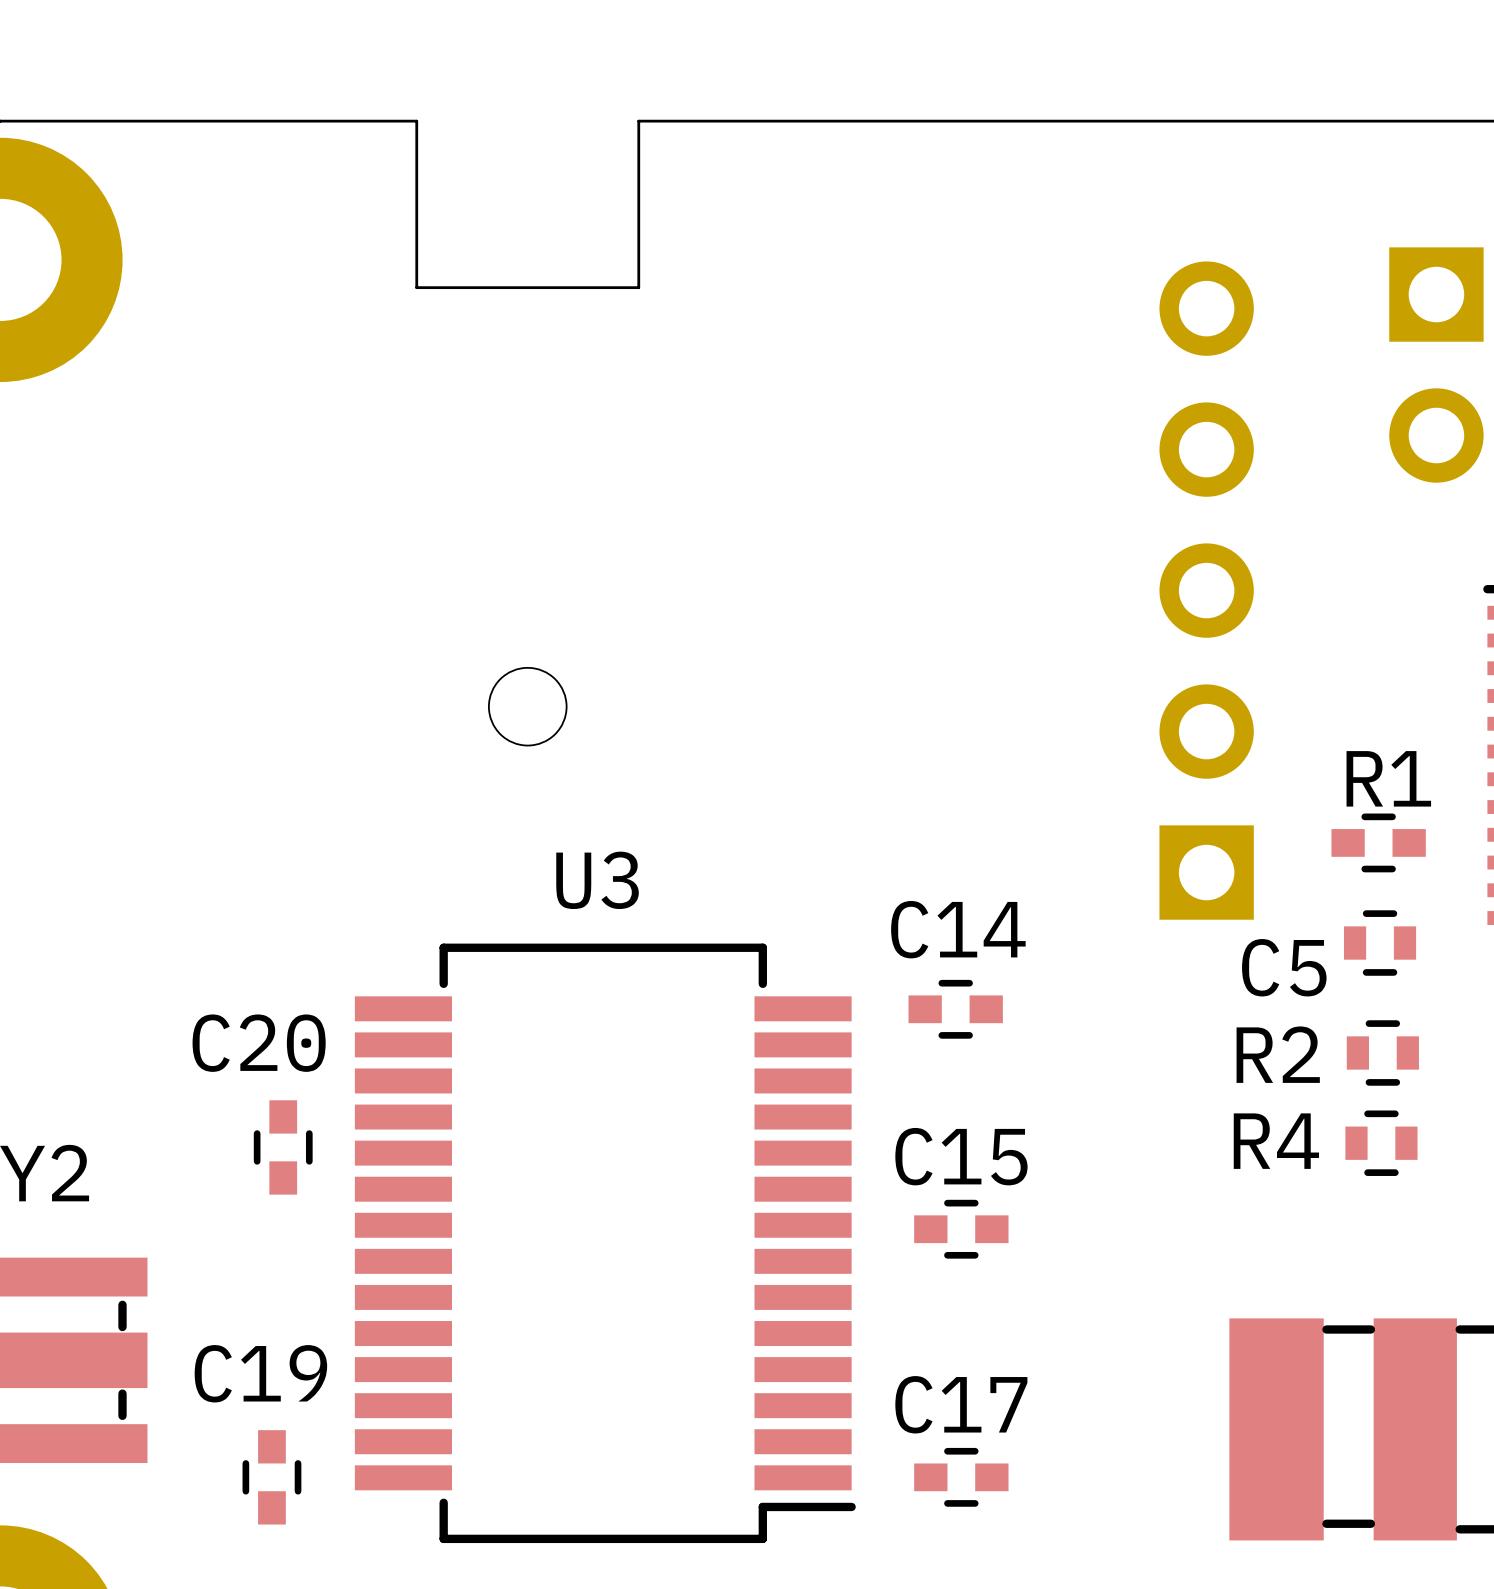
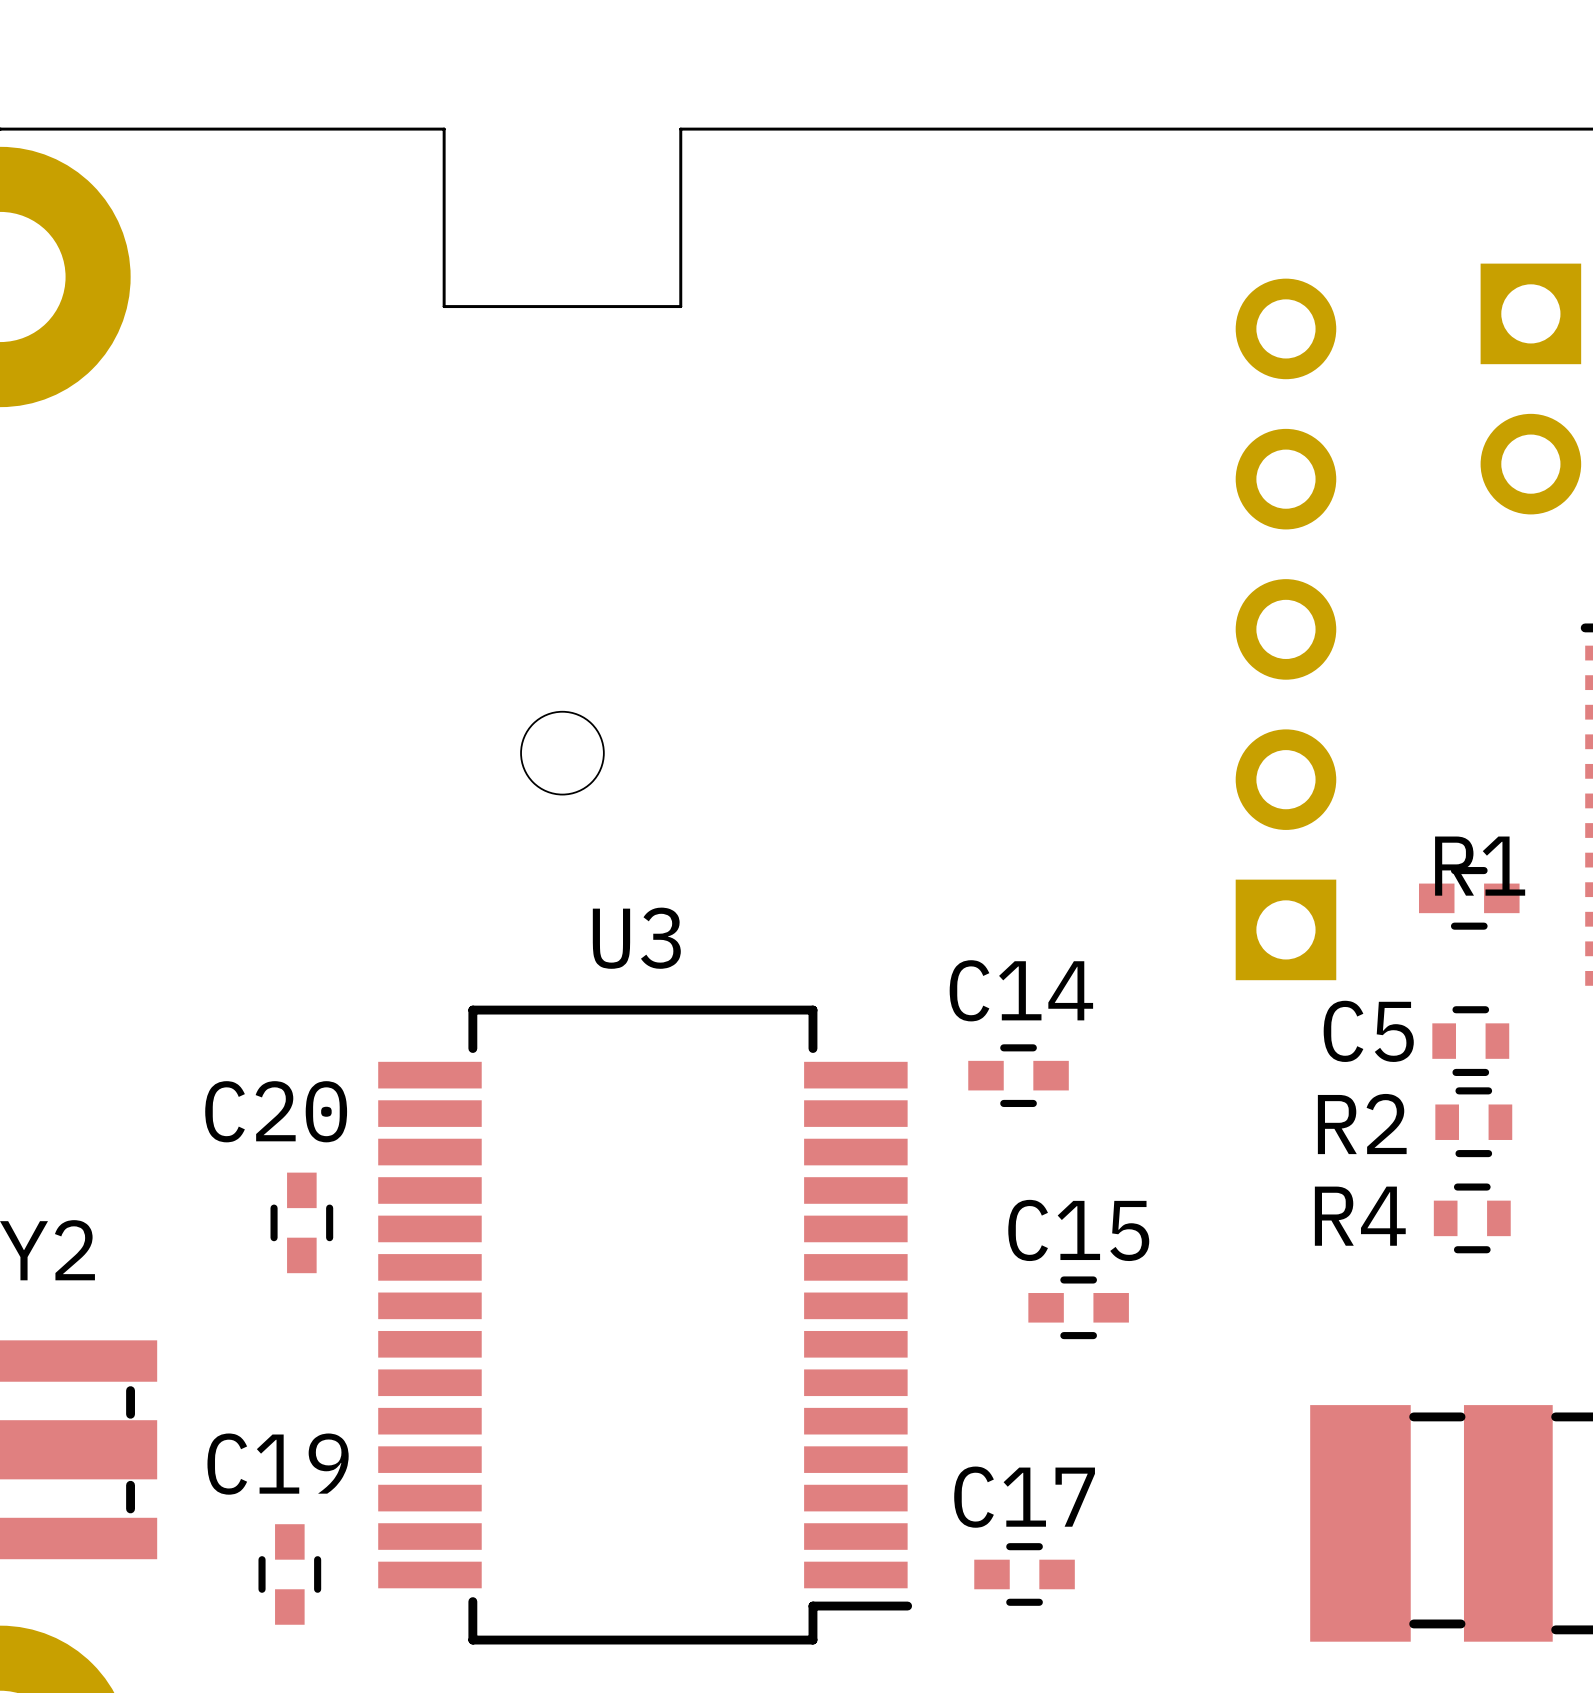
R1 position: (1380, 943) -> (1470, 1041)
C15 position: (961, 1229) -> (1078, 1307)

